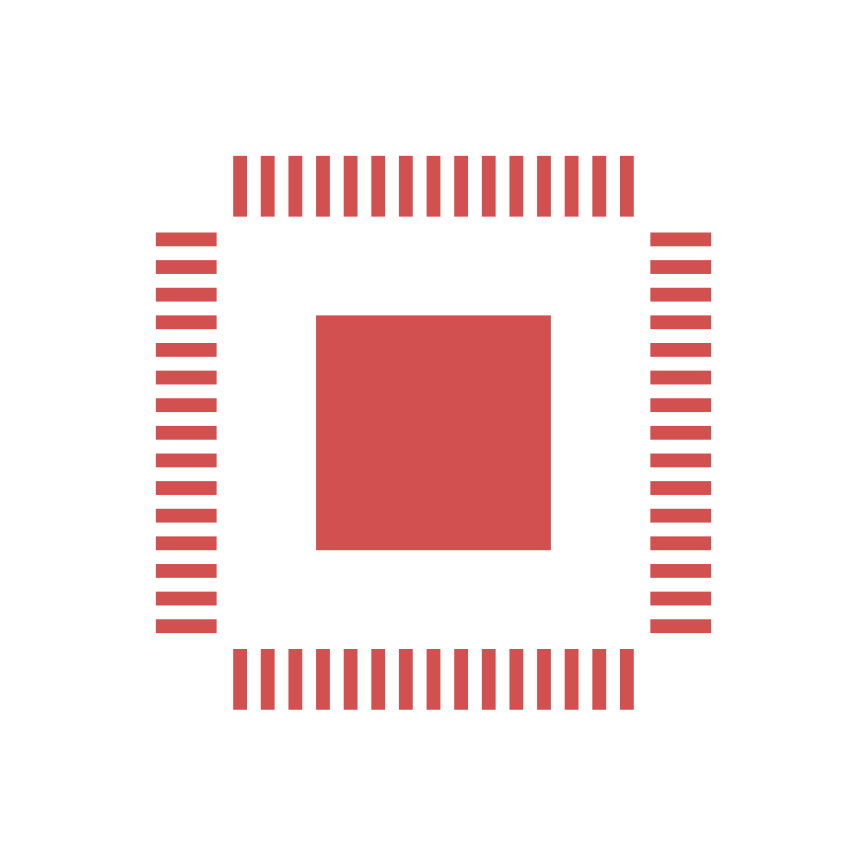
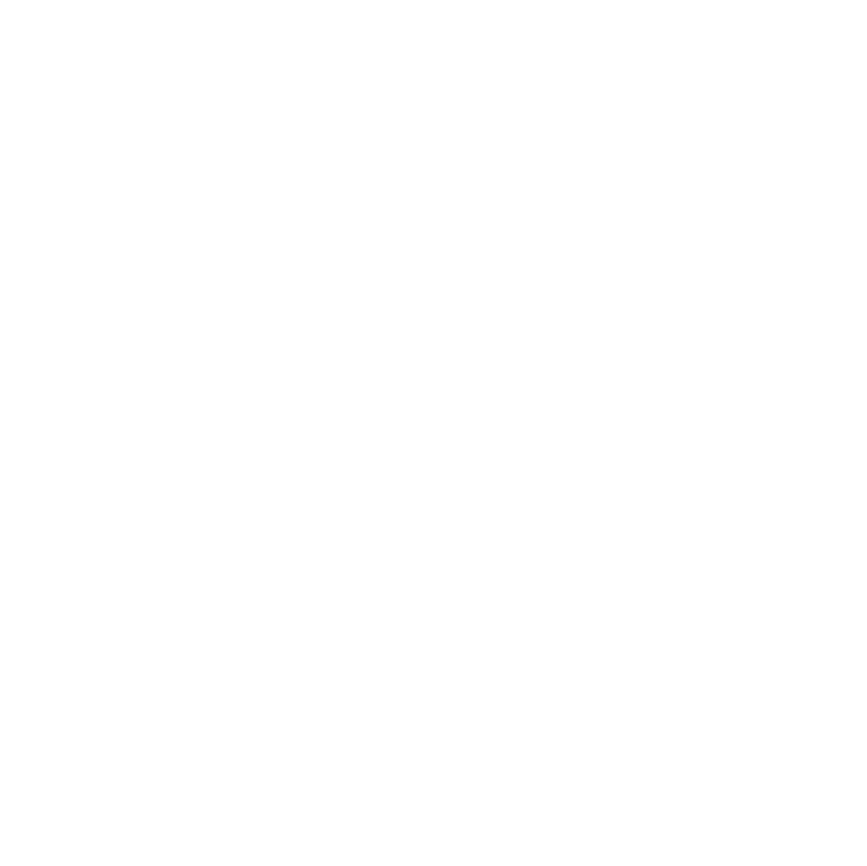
part: (433, 432) -> none

